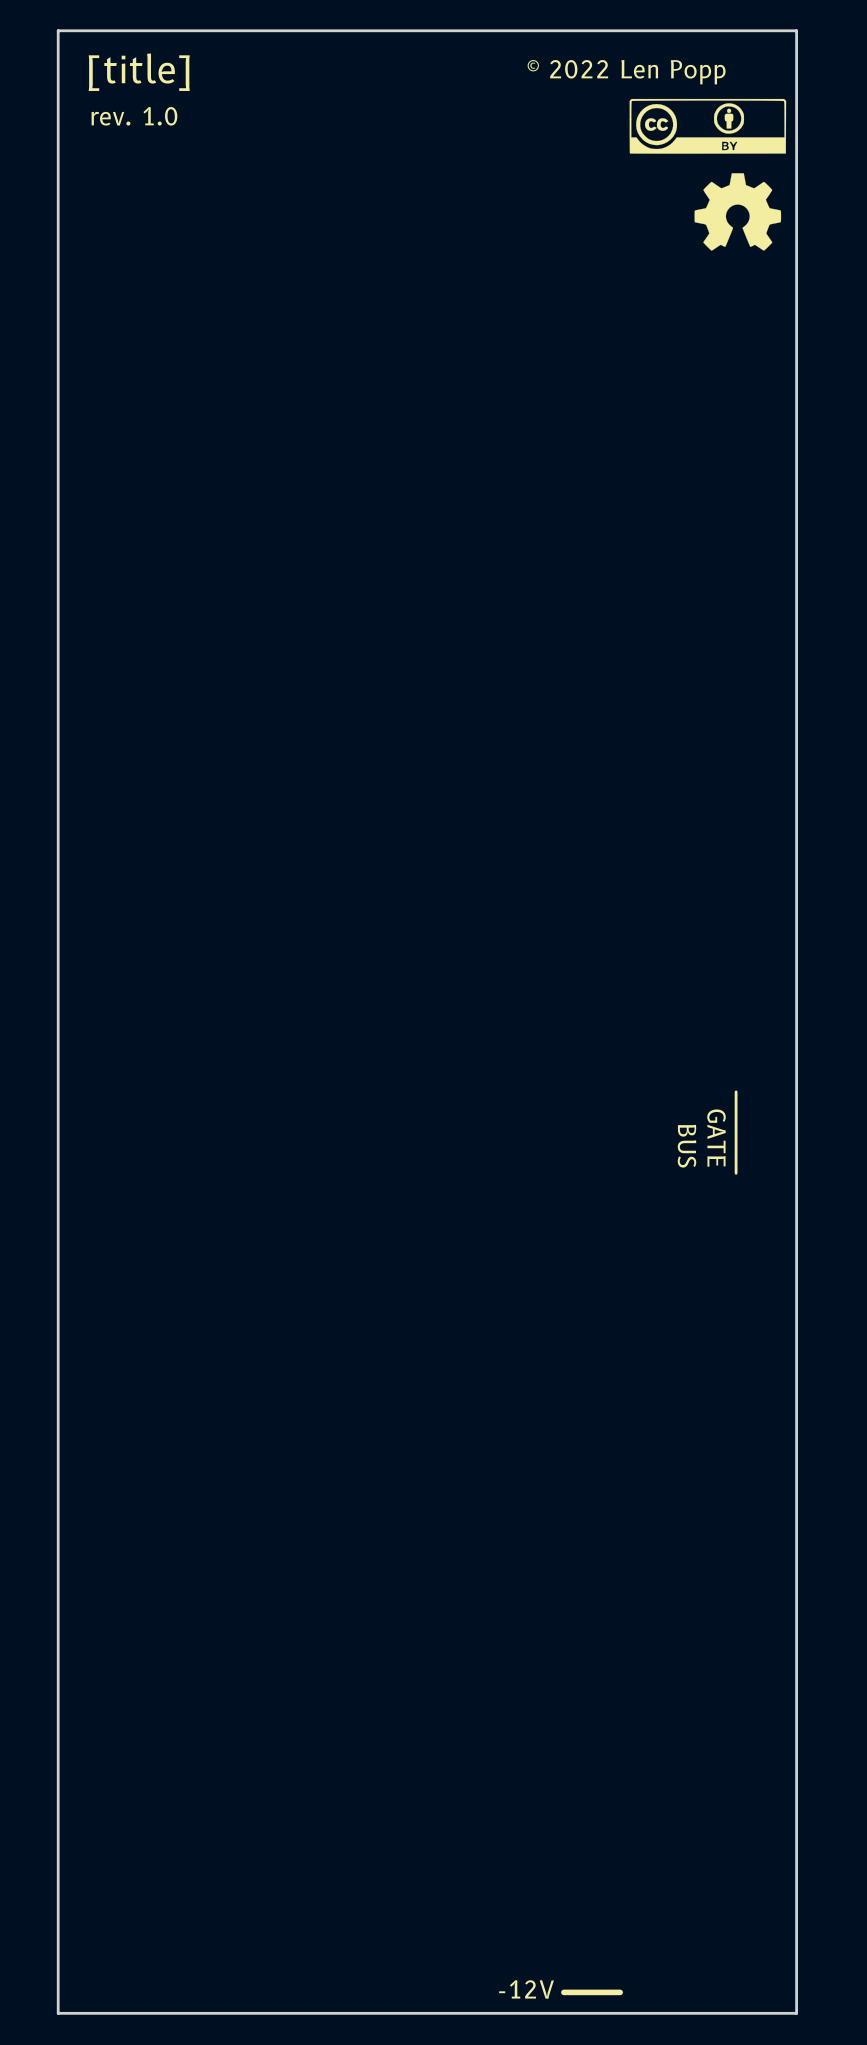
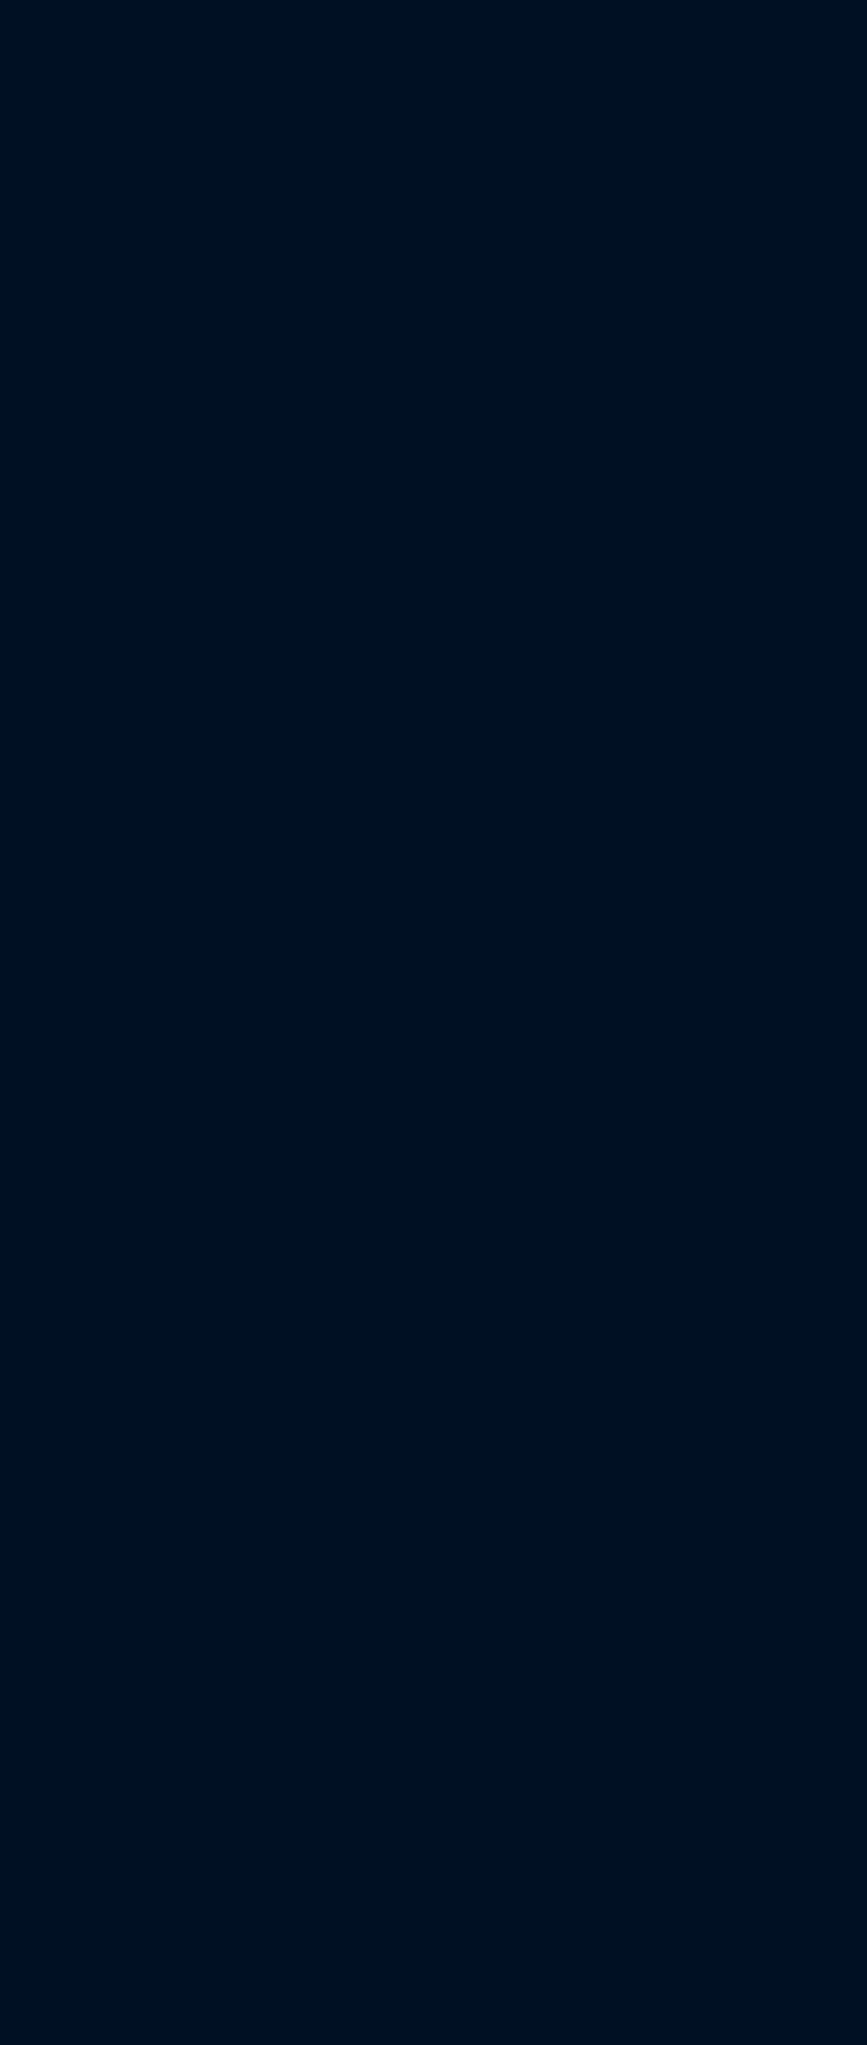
board edge: (58, 30) (58, 2013) (796, 2013) (796, 30) (58, 30) -> none
text: [title] (139, 72) -> none
text: © 2022 Len Popp (626, 72) -> none
drawing: [629, 98, 787, 251] -> none
text: rev. 1.0 (134, 116) -> none
line: (736, 1091) (736, 1173) -> none
text: GATE (716, 1138) -> none
text: BUS (687, 1146) -> none
text: -12V (526, 1989) -> none
line: (563, 1992) (620, 1992) -> none

